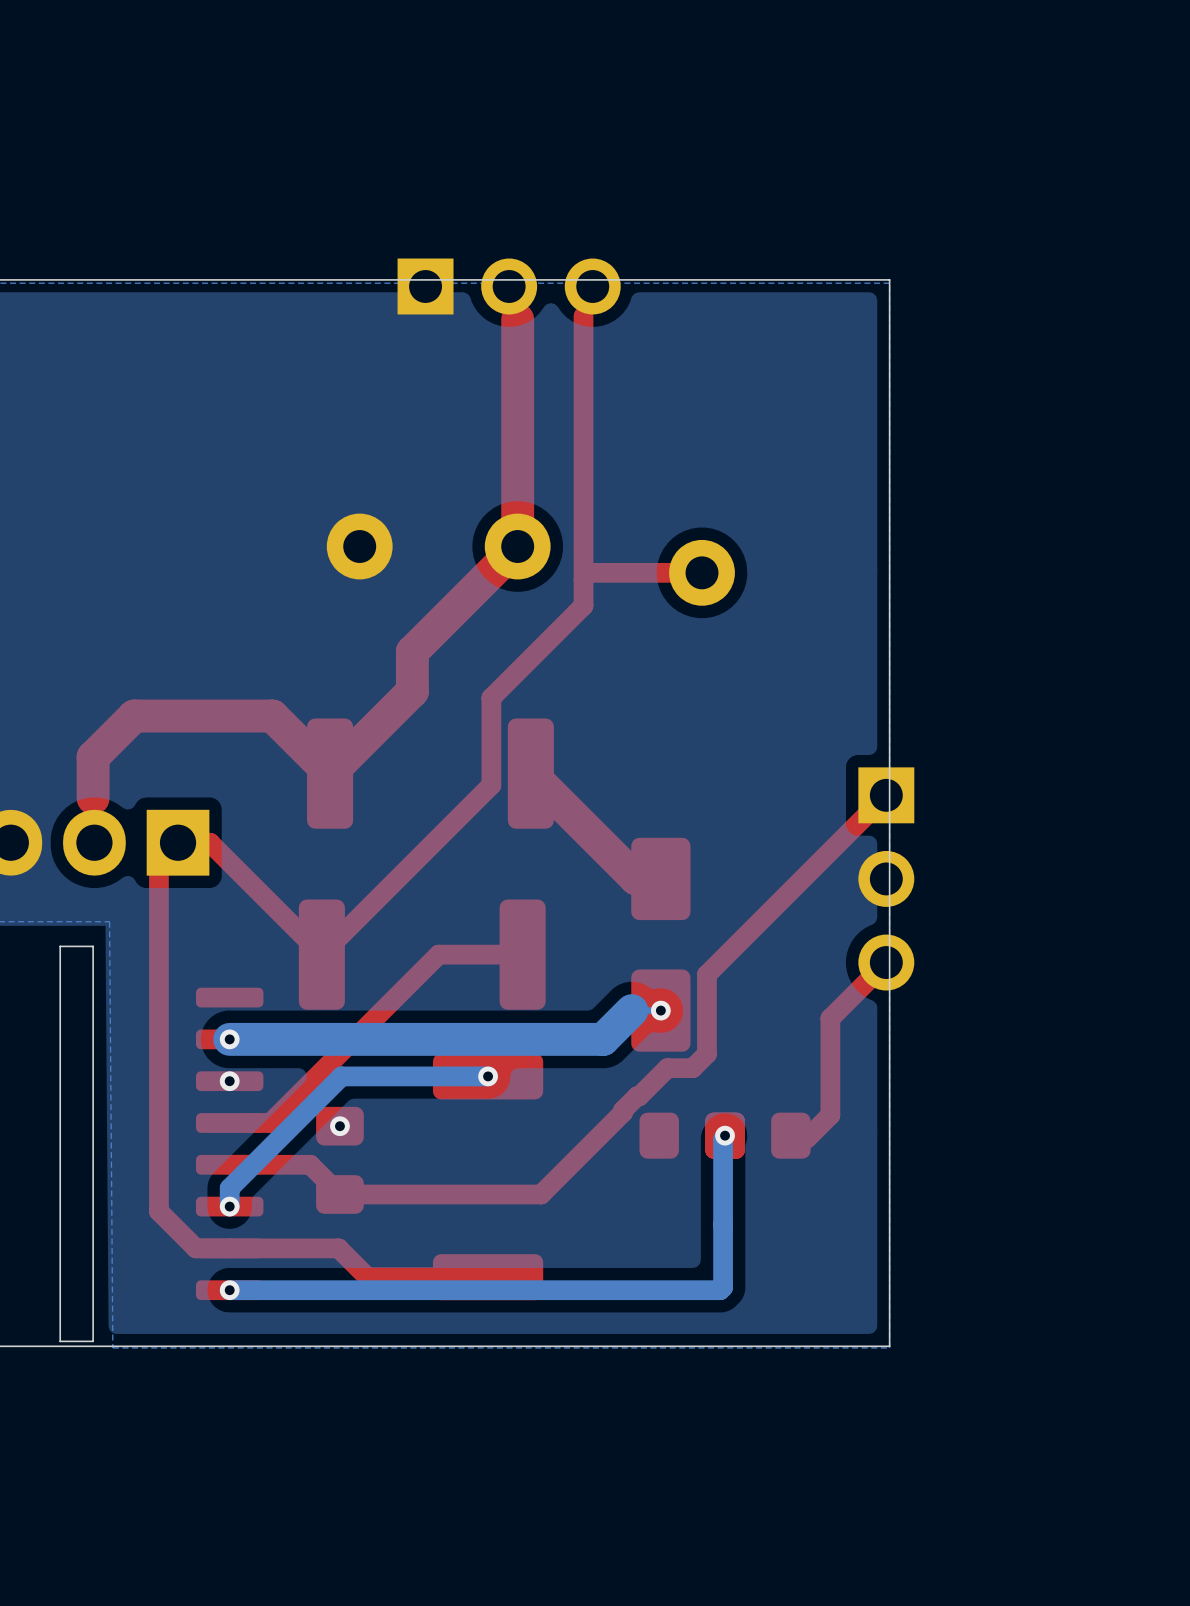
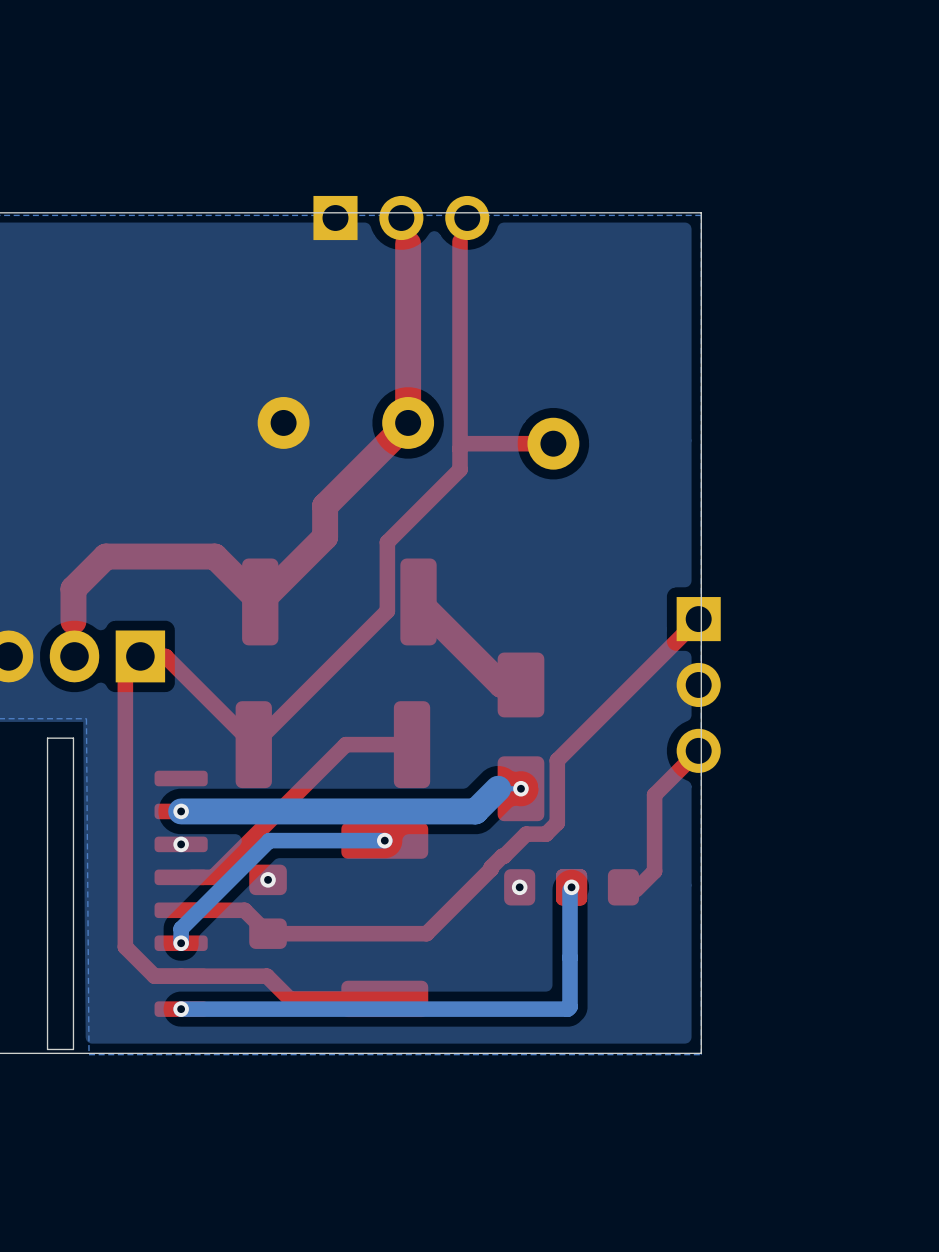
via: none -> (519, 887)

